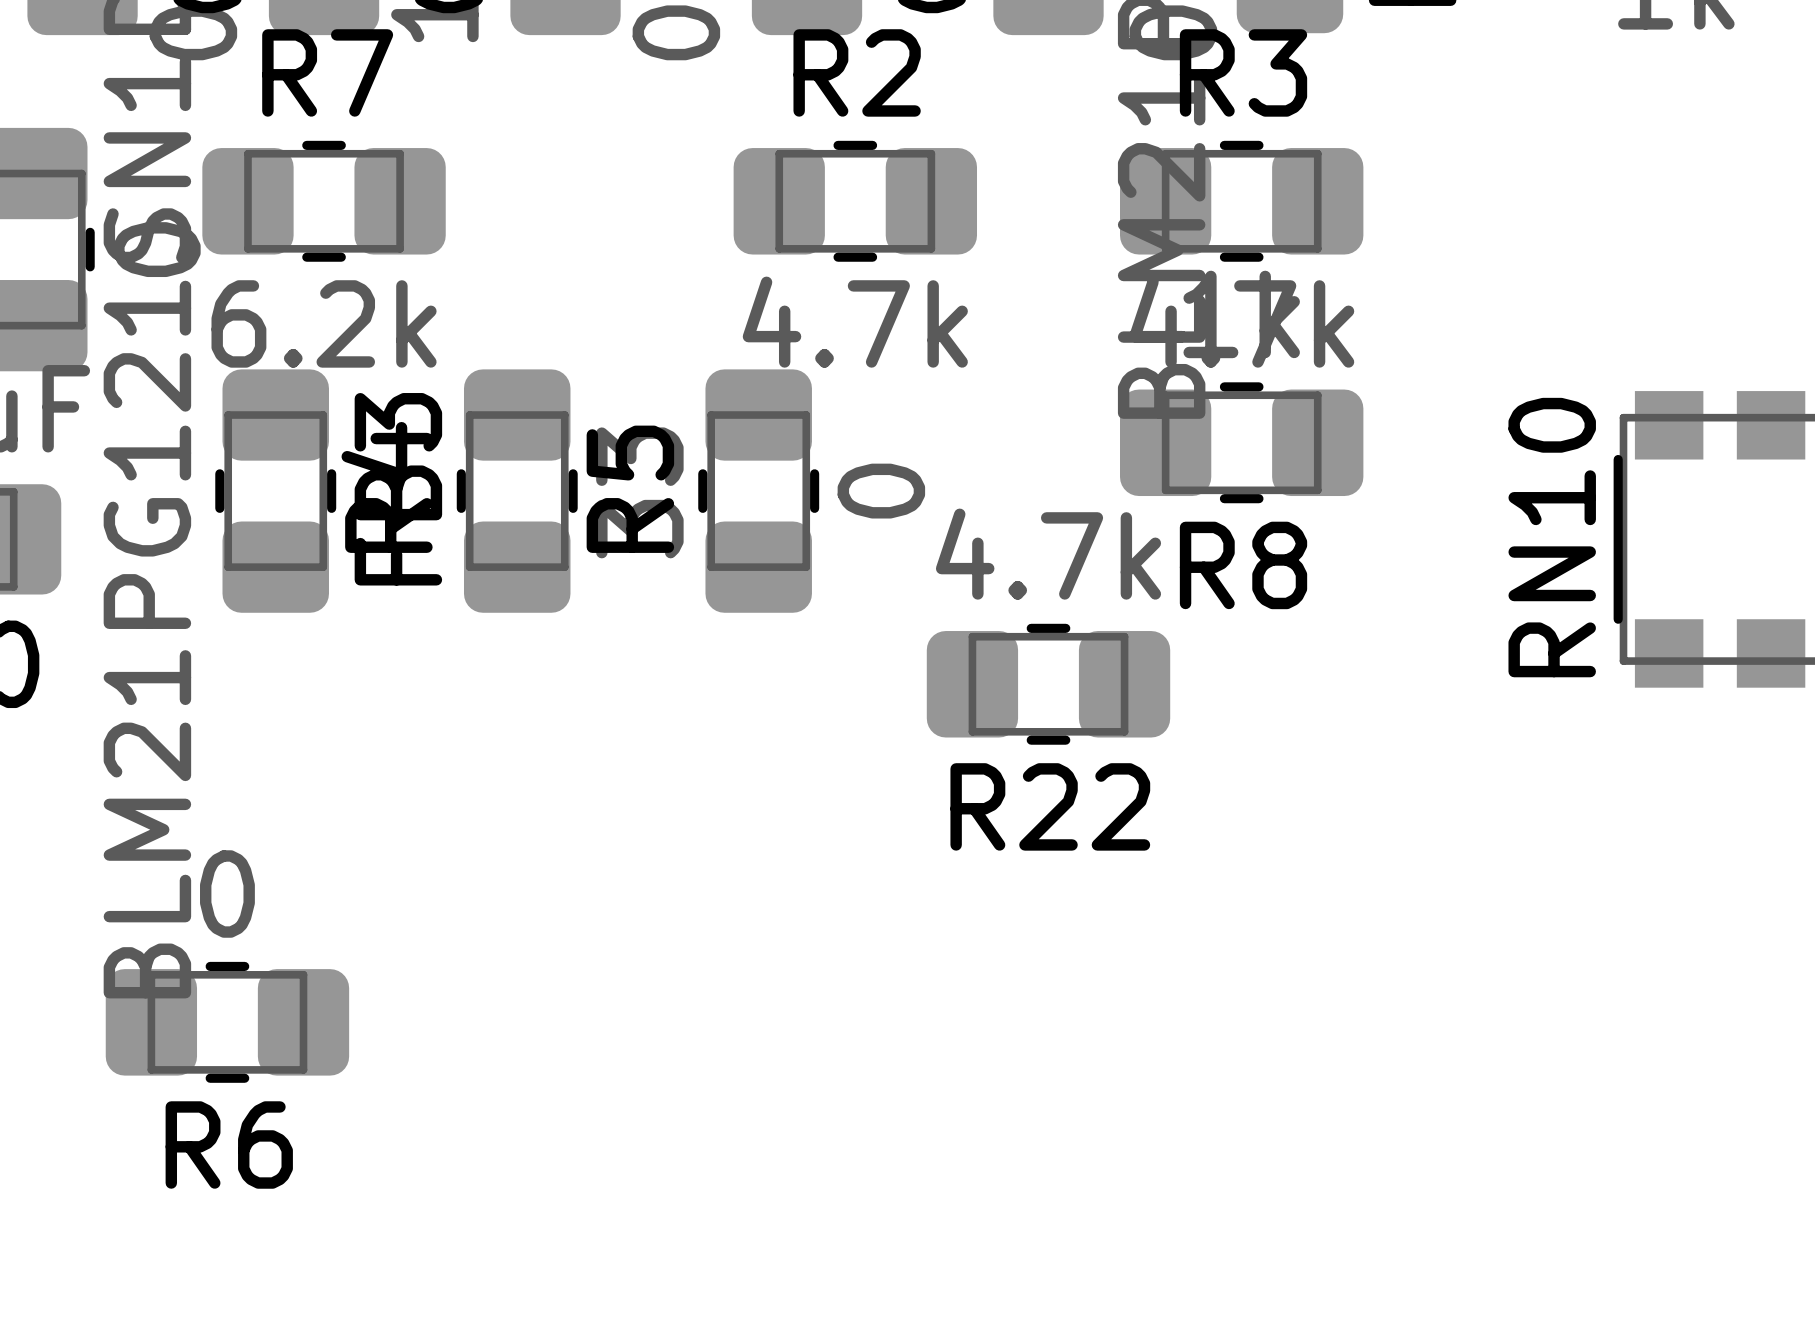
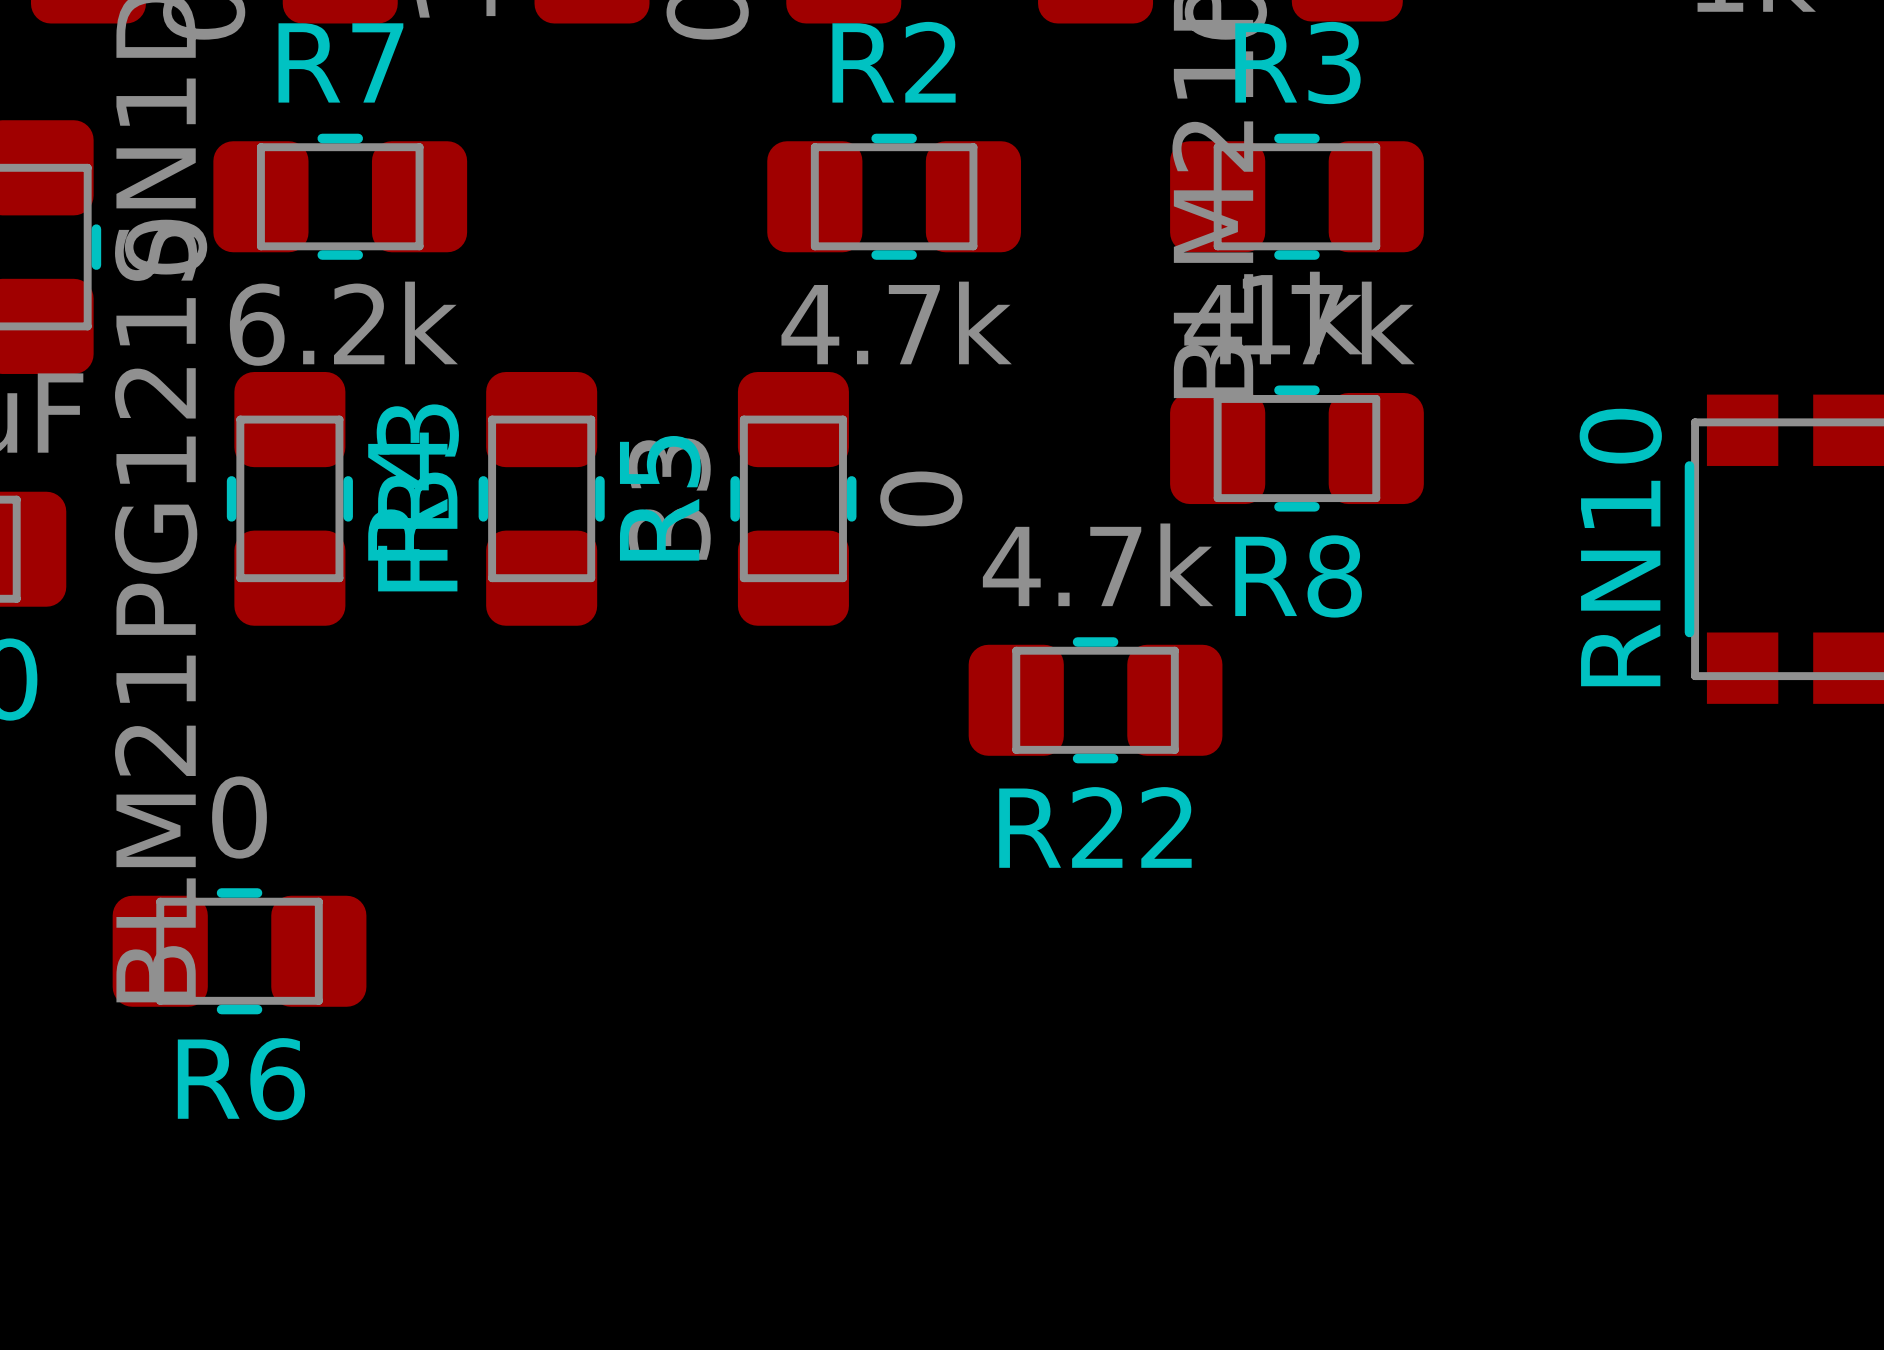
R6 position: (227, 1022) -> (239, 951)

